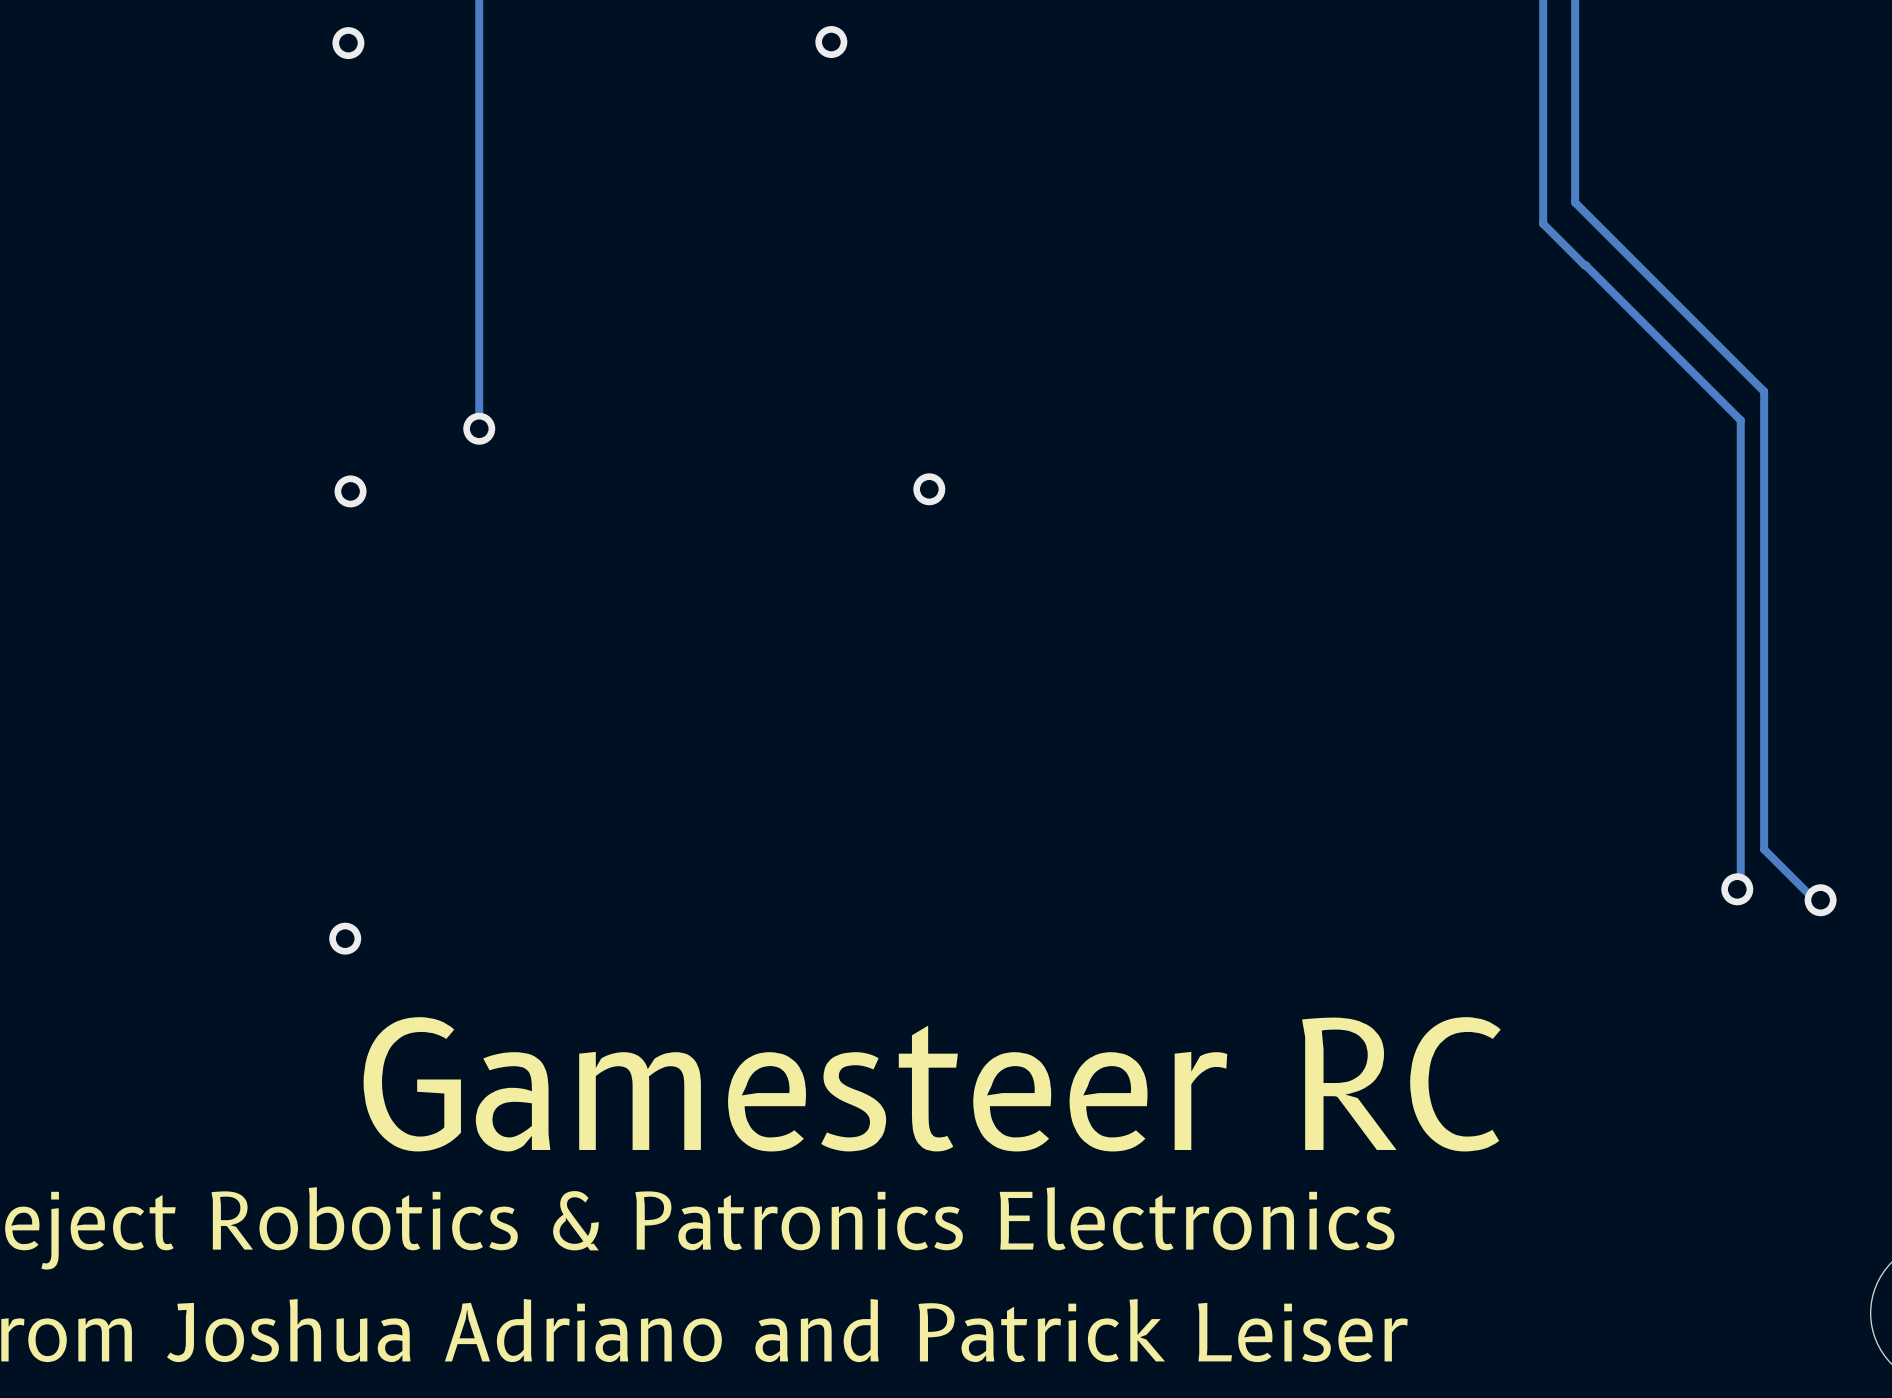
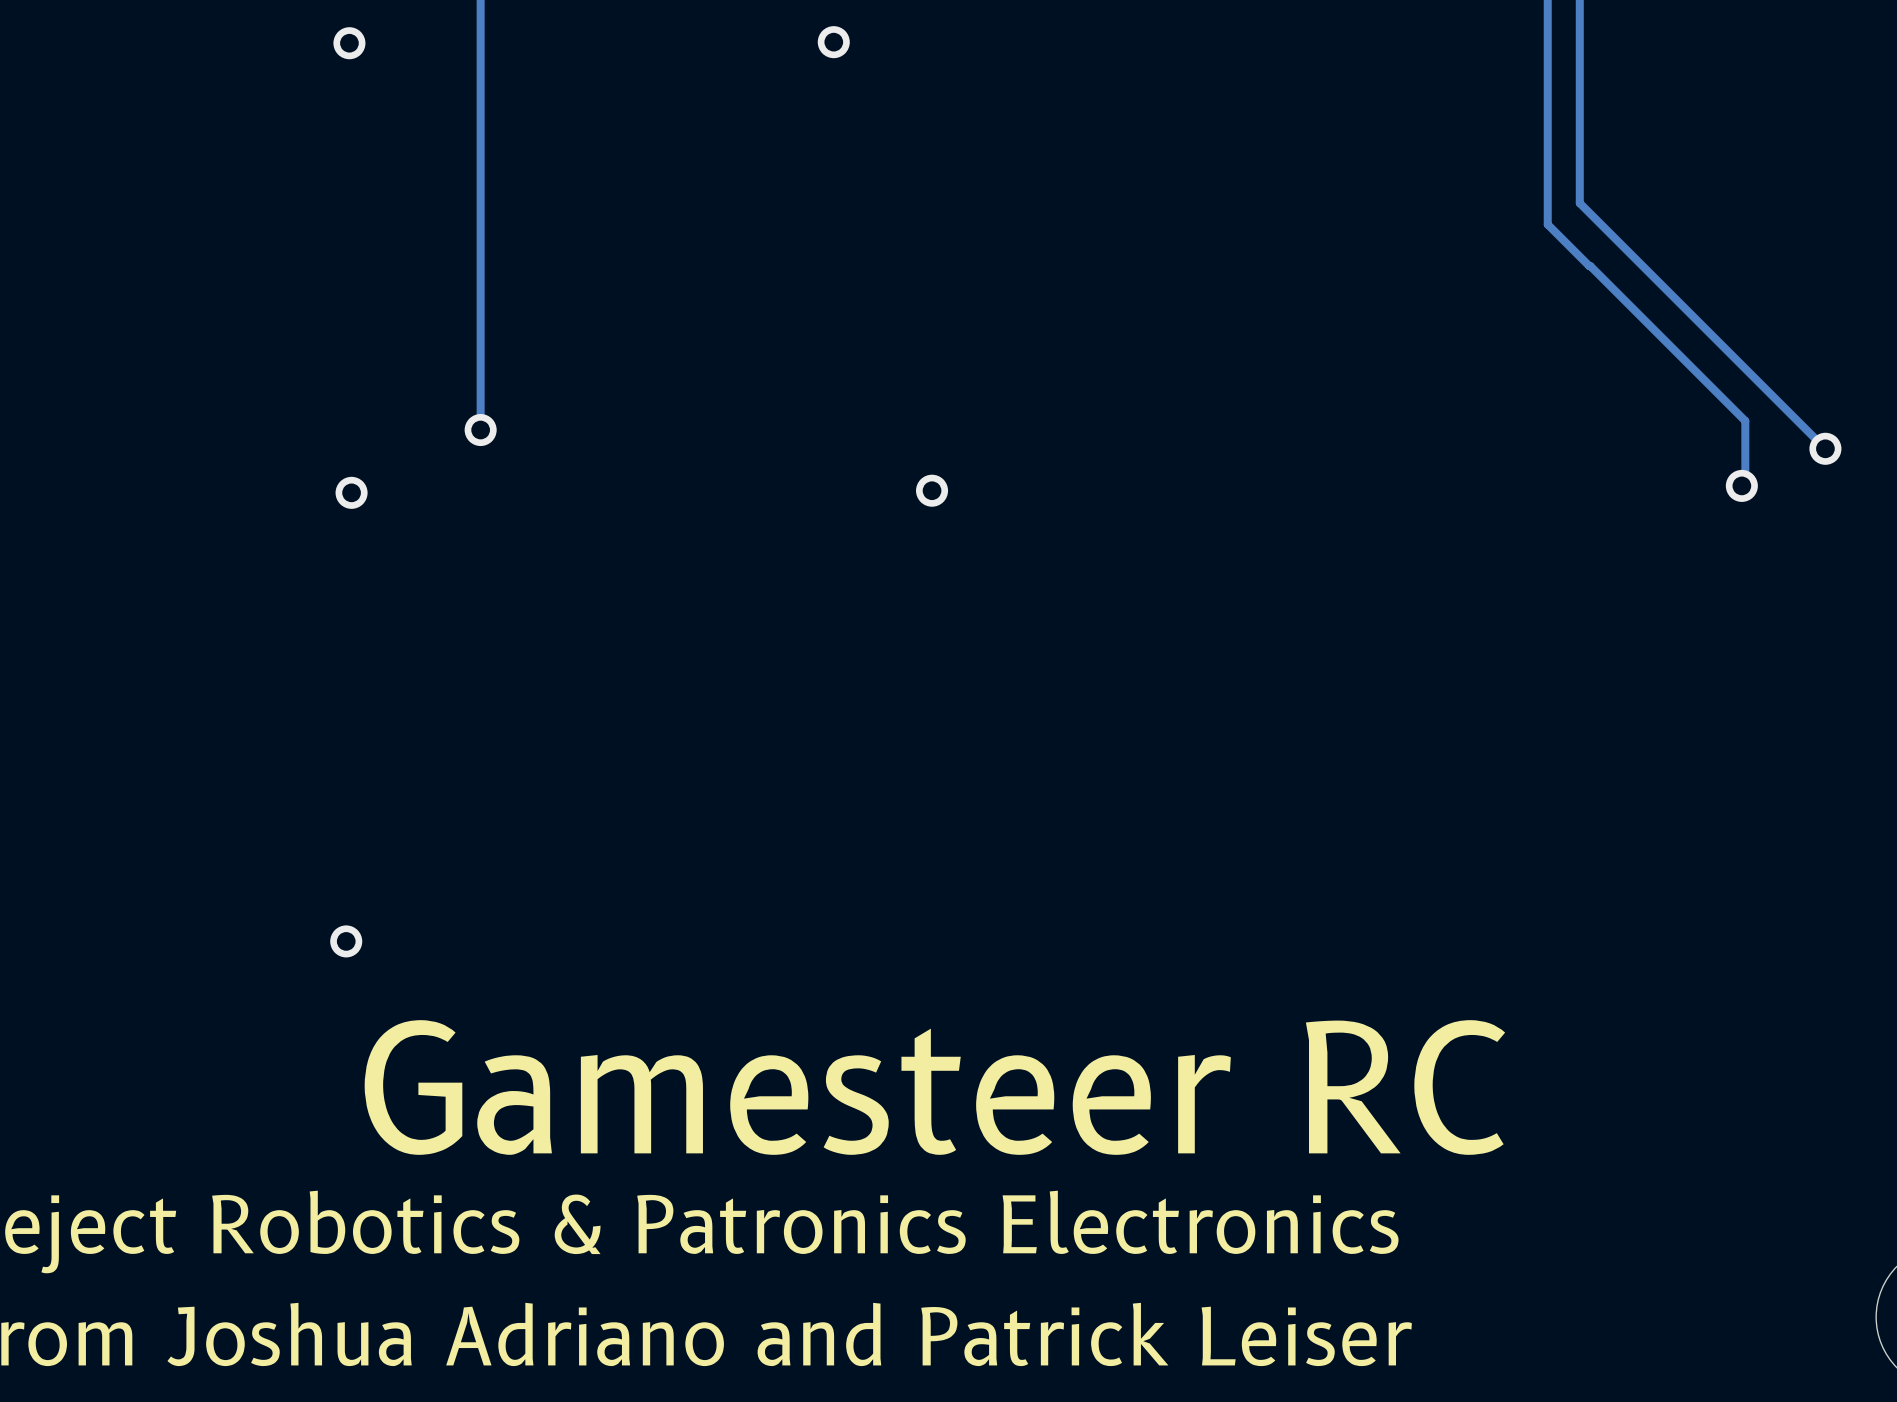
track: (1764, 391) (1764, 849) (1814, 900) (1820, 900) -> (1769, 392) (1825, 448)
track: (1740, 420) (1740, 884) -> (1745, 421) (1745, 480)
via: none -> (1825, 448)
via: none -> (1741, 485)
via: (1737, 889) -> none
via: (1820, 900) -> none

